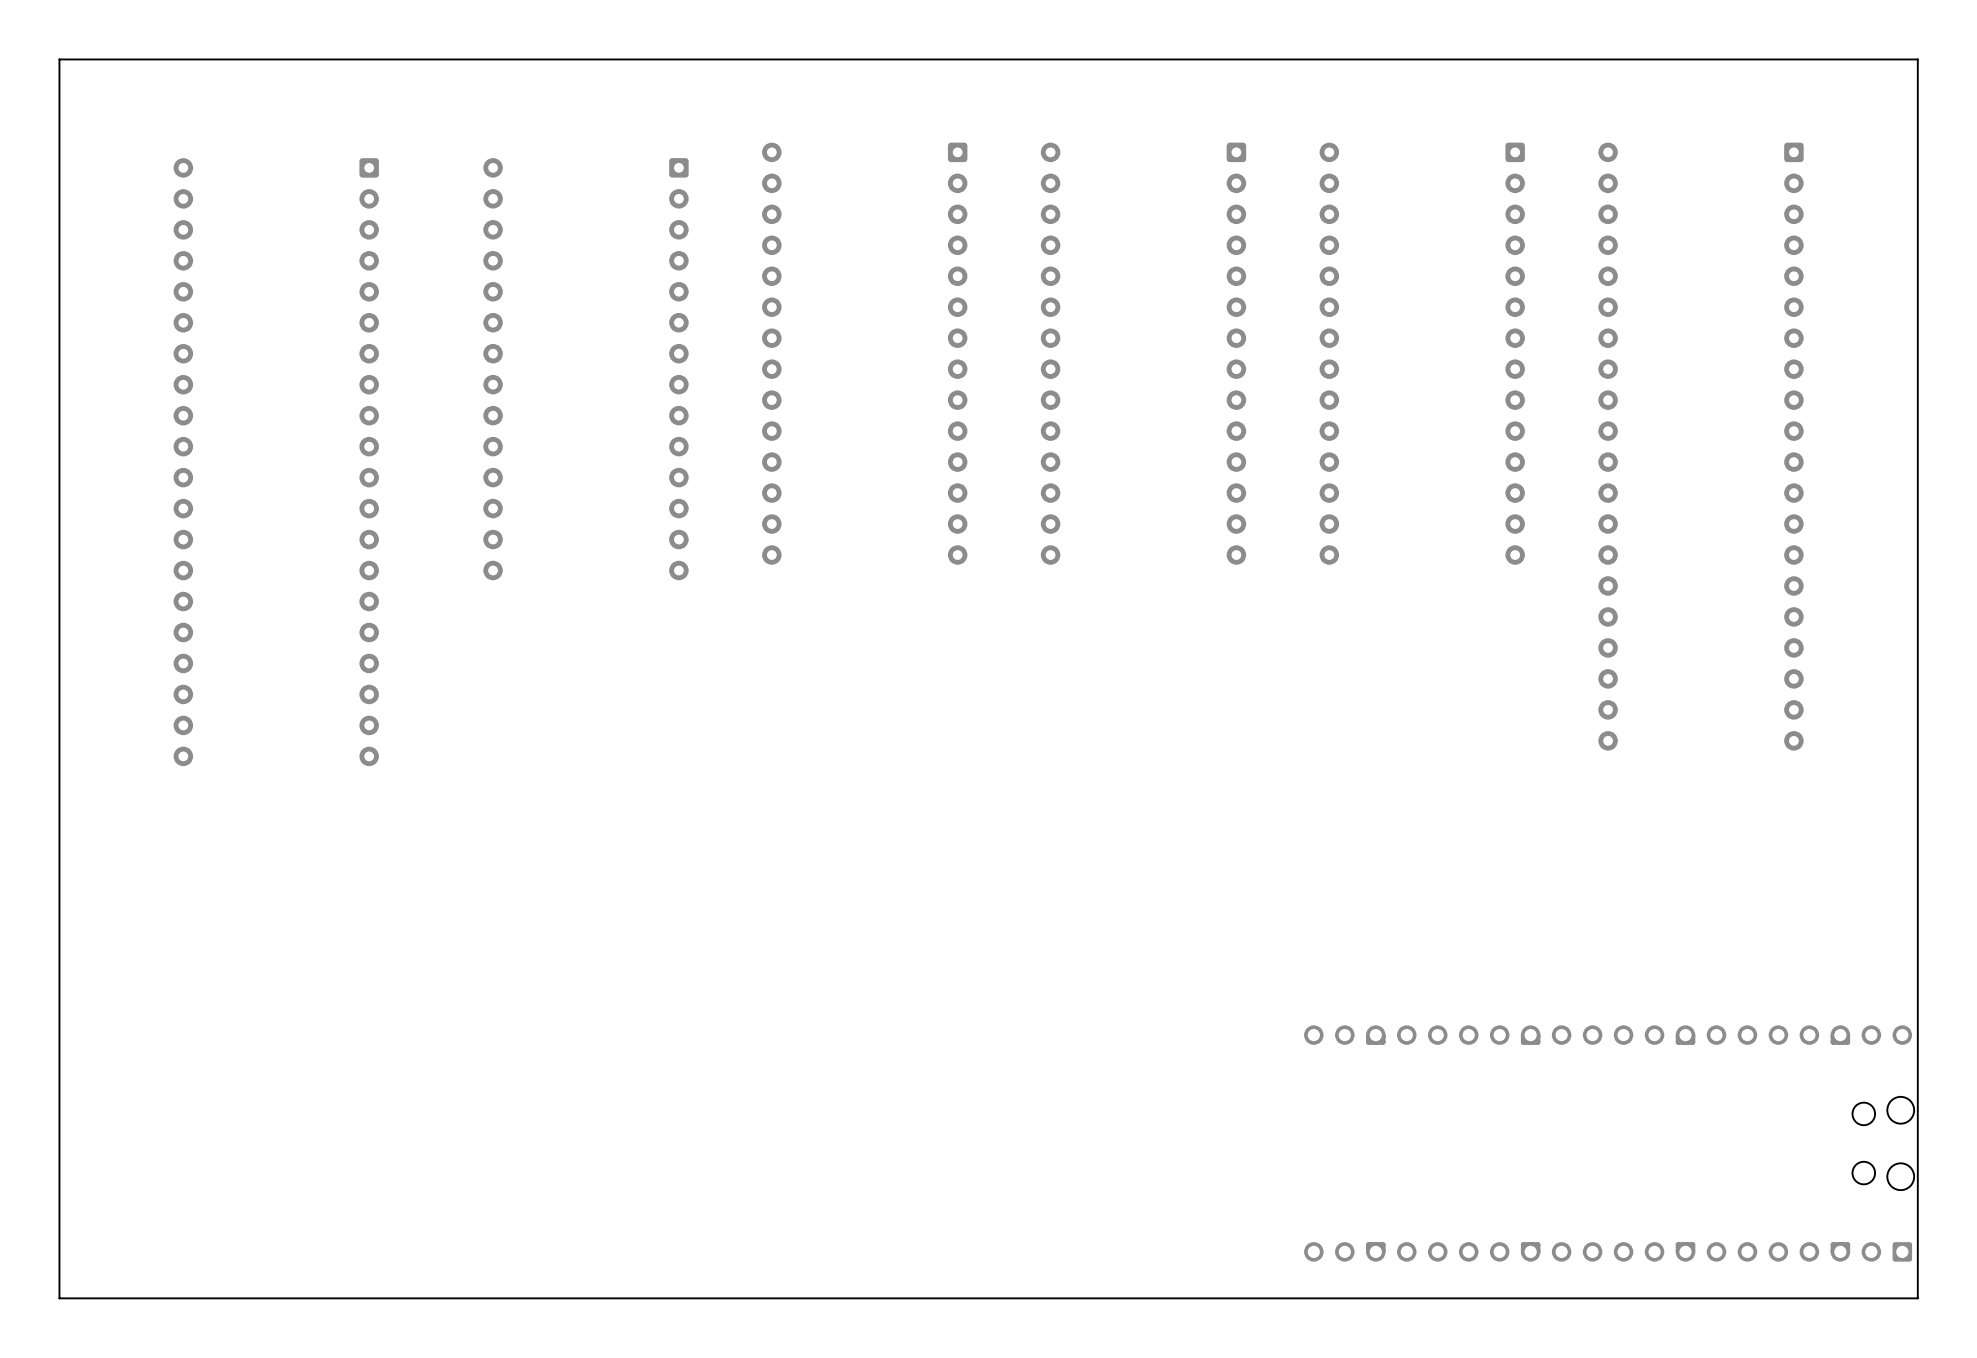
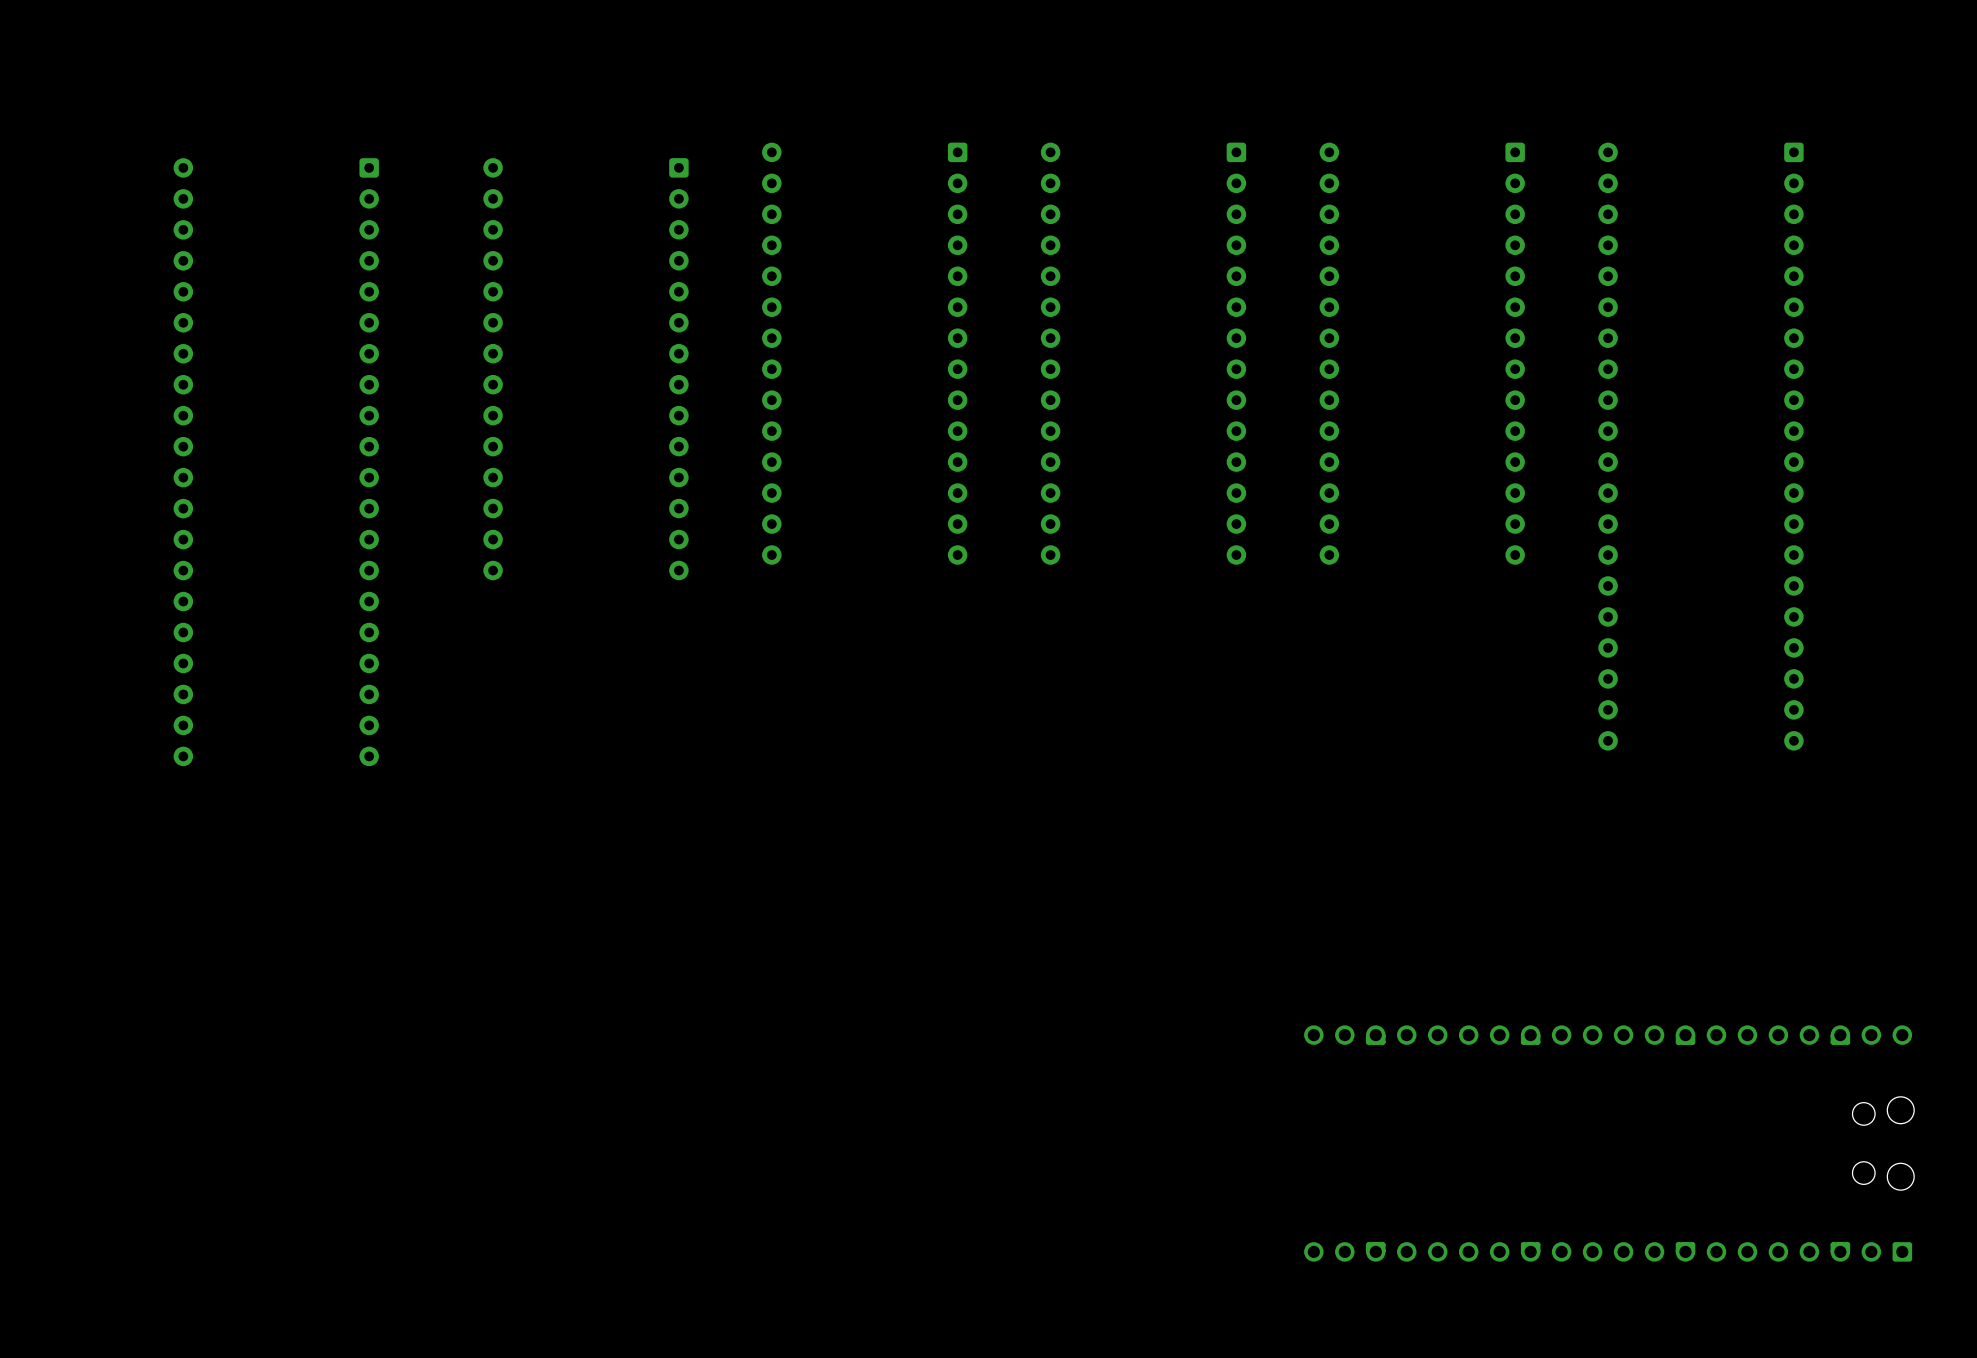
board edge: (1917, 59) (59, 59) (59, 1298) (1917, 1298) (1917, 59) -> none

